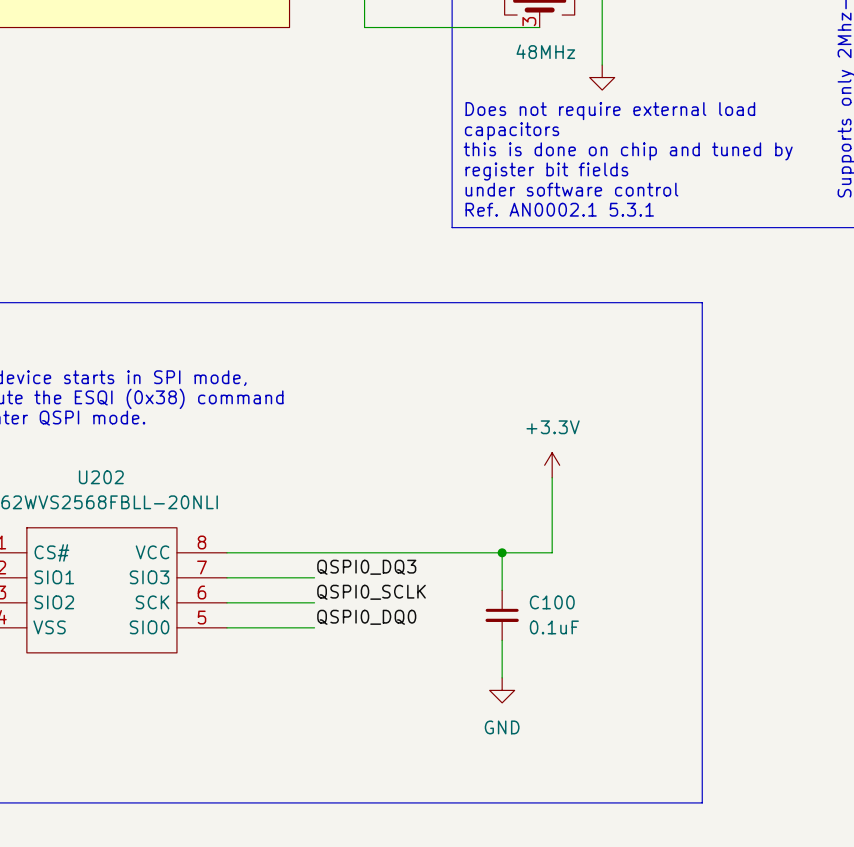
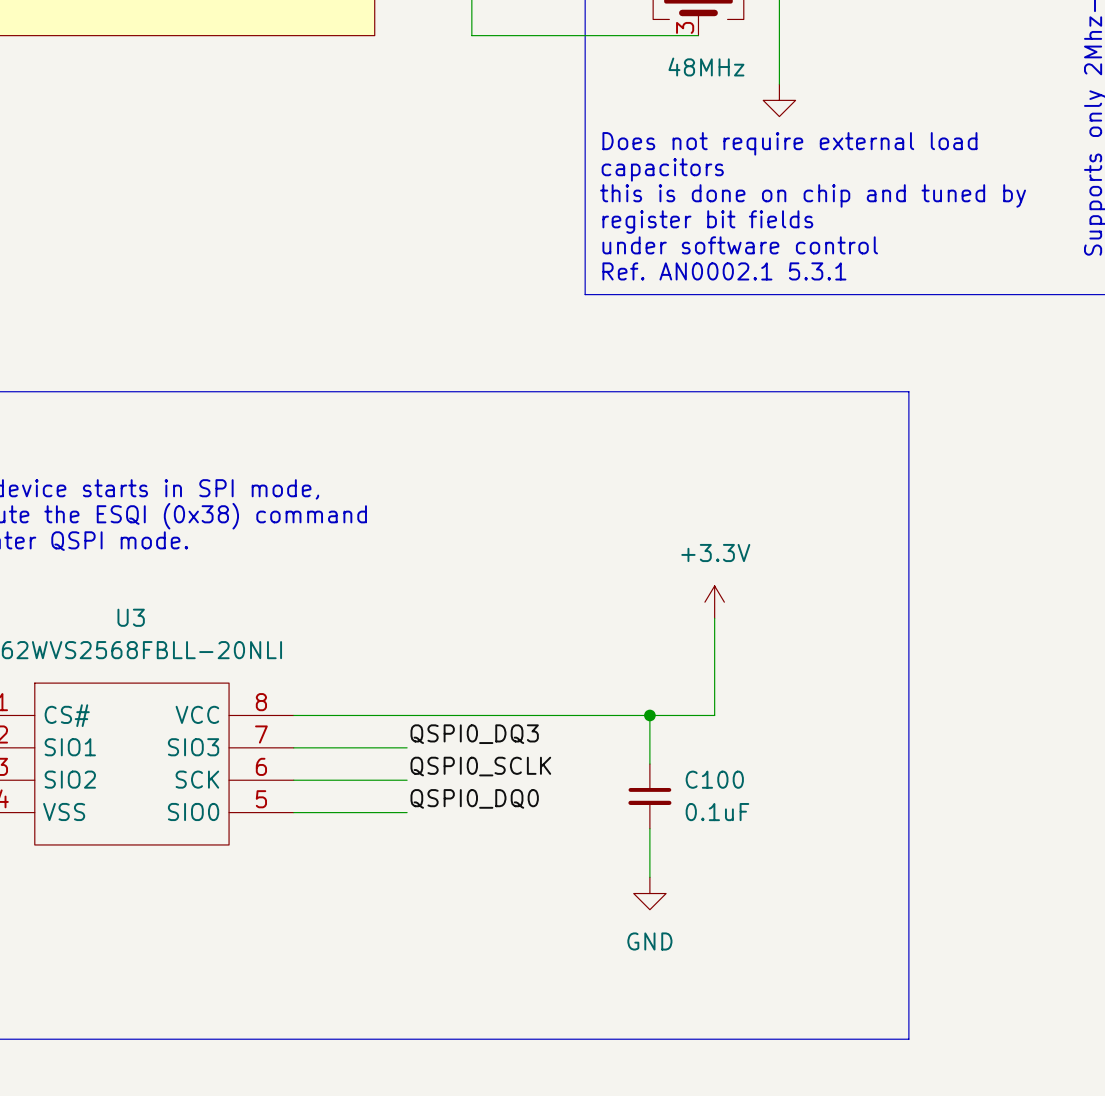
U202 name: U202 (101, 477) -> U3 (131, 617)

